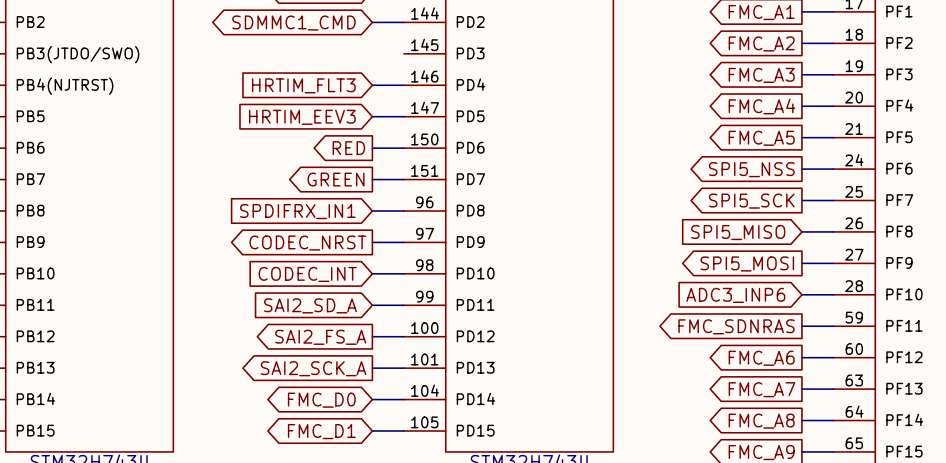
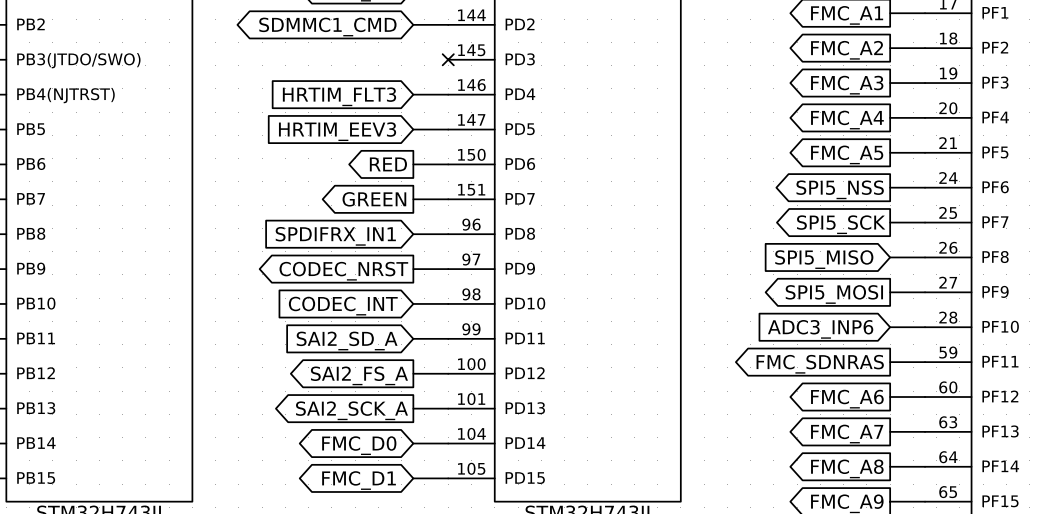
no-connect mark: none -> (448, 59)

